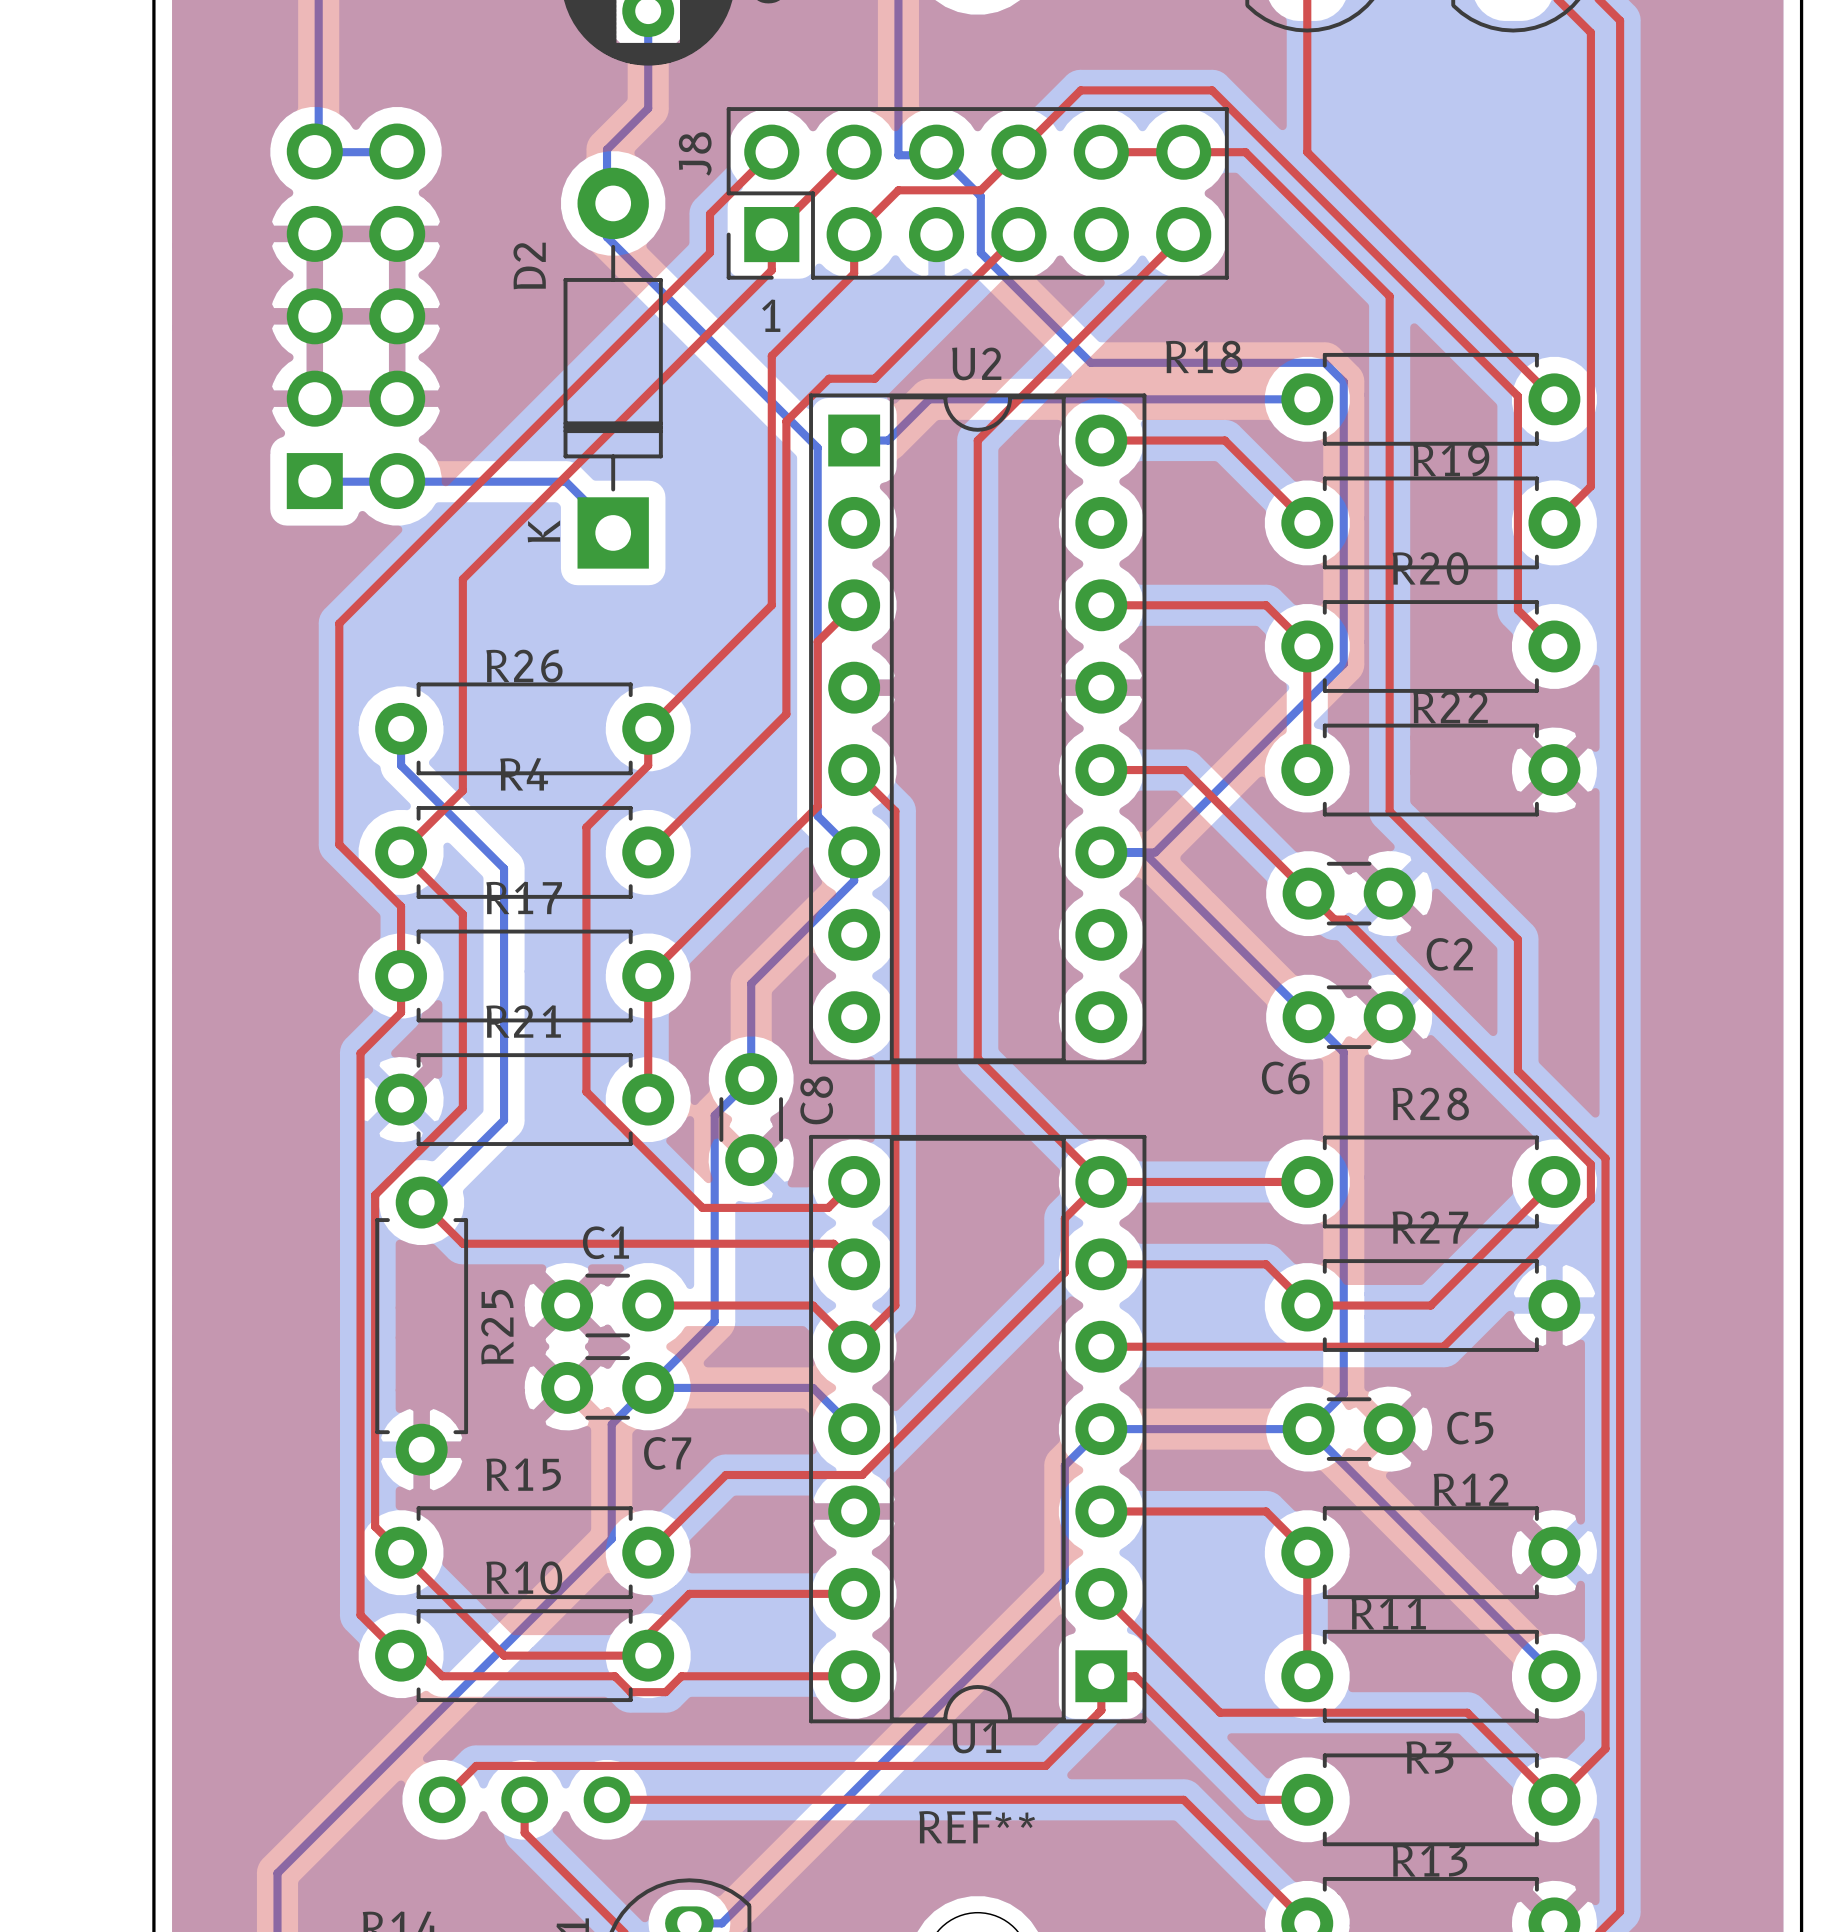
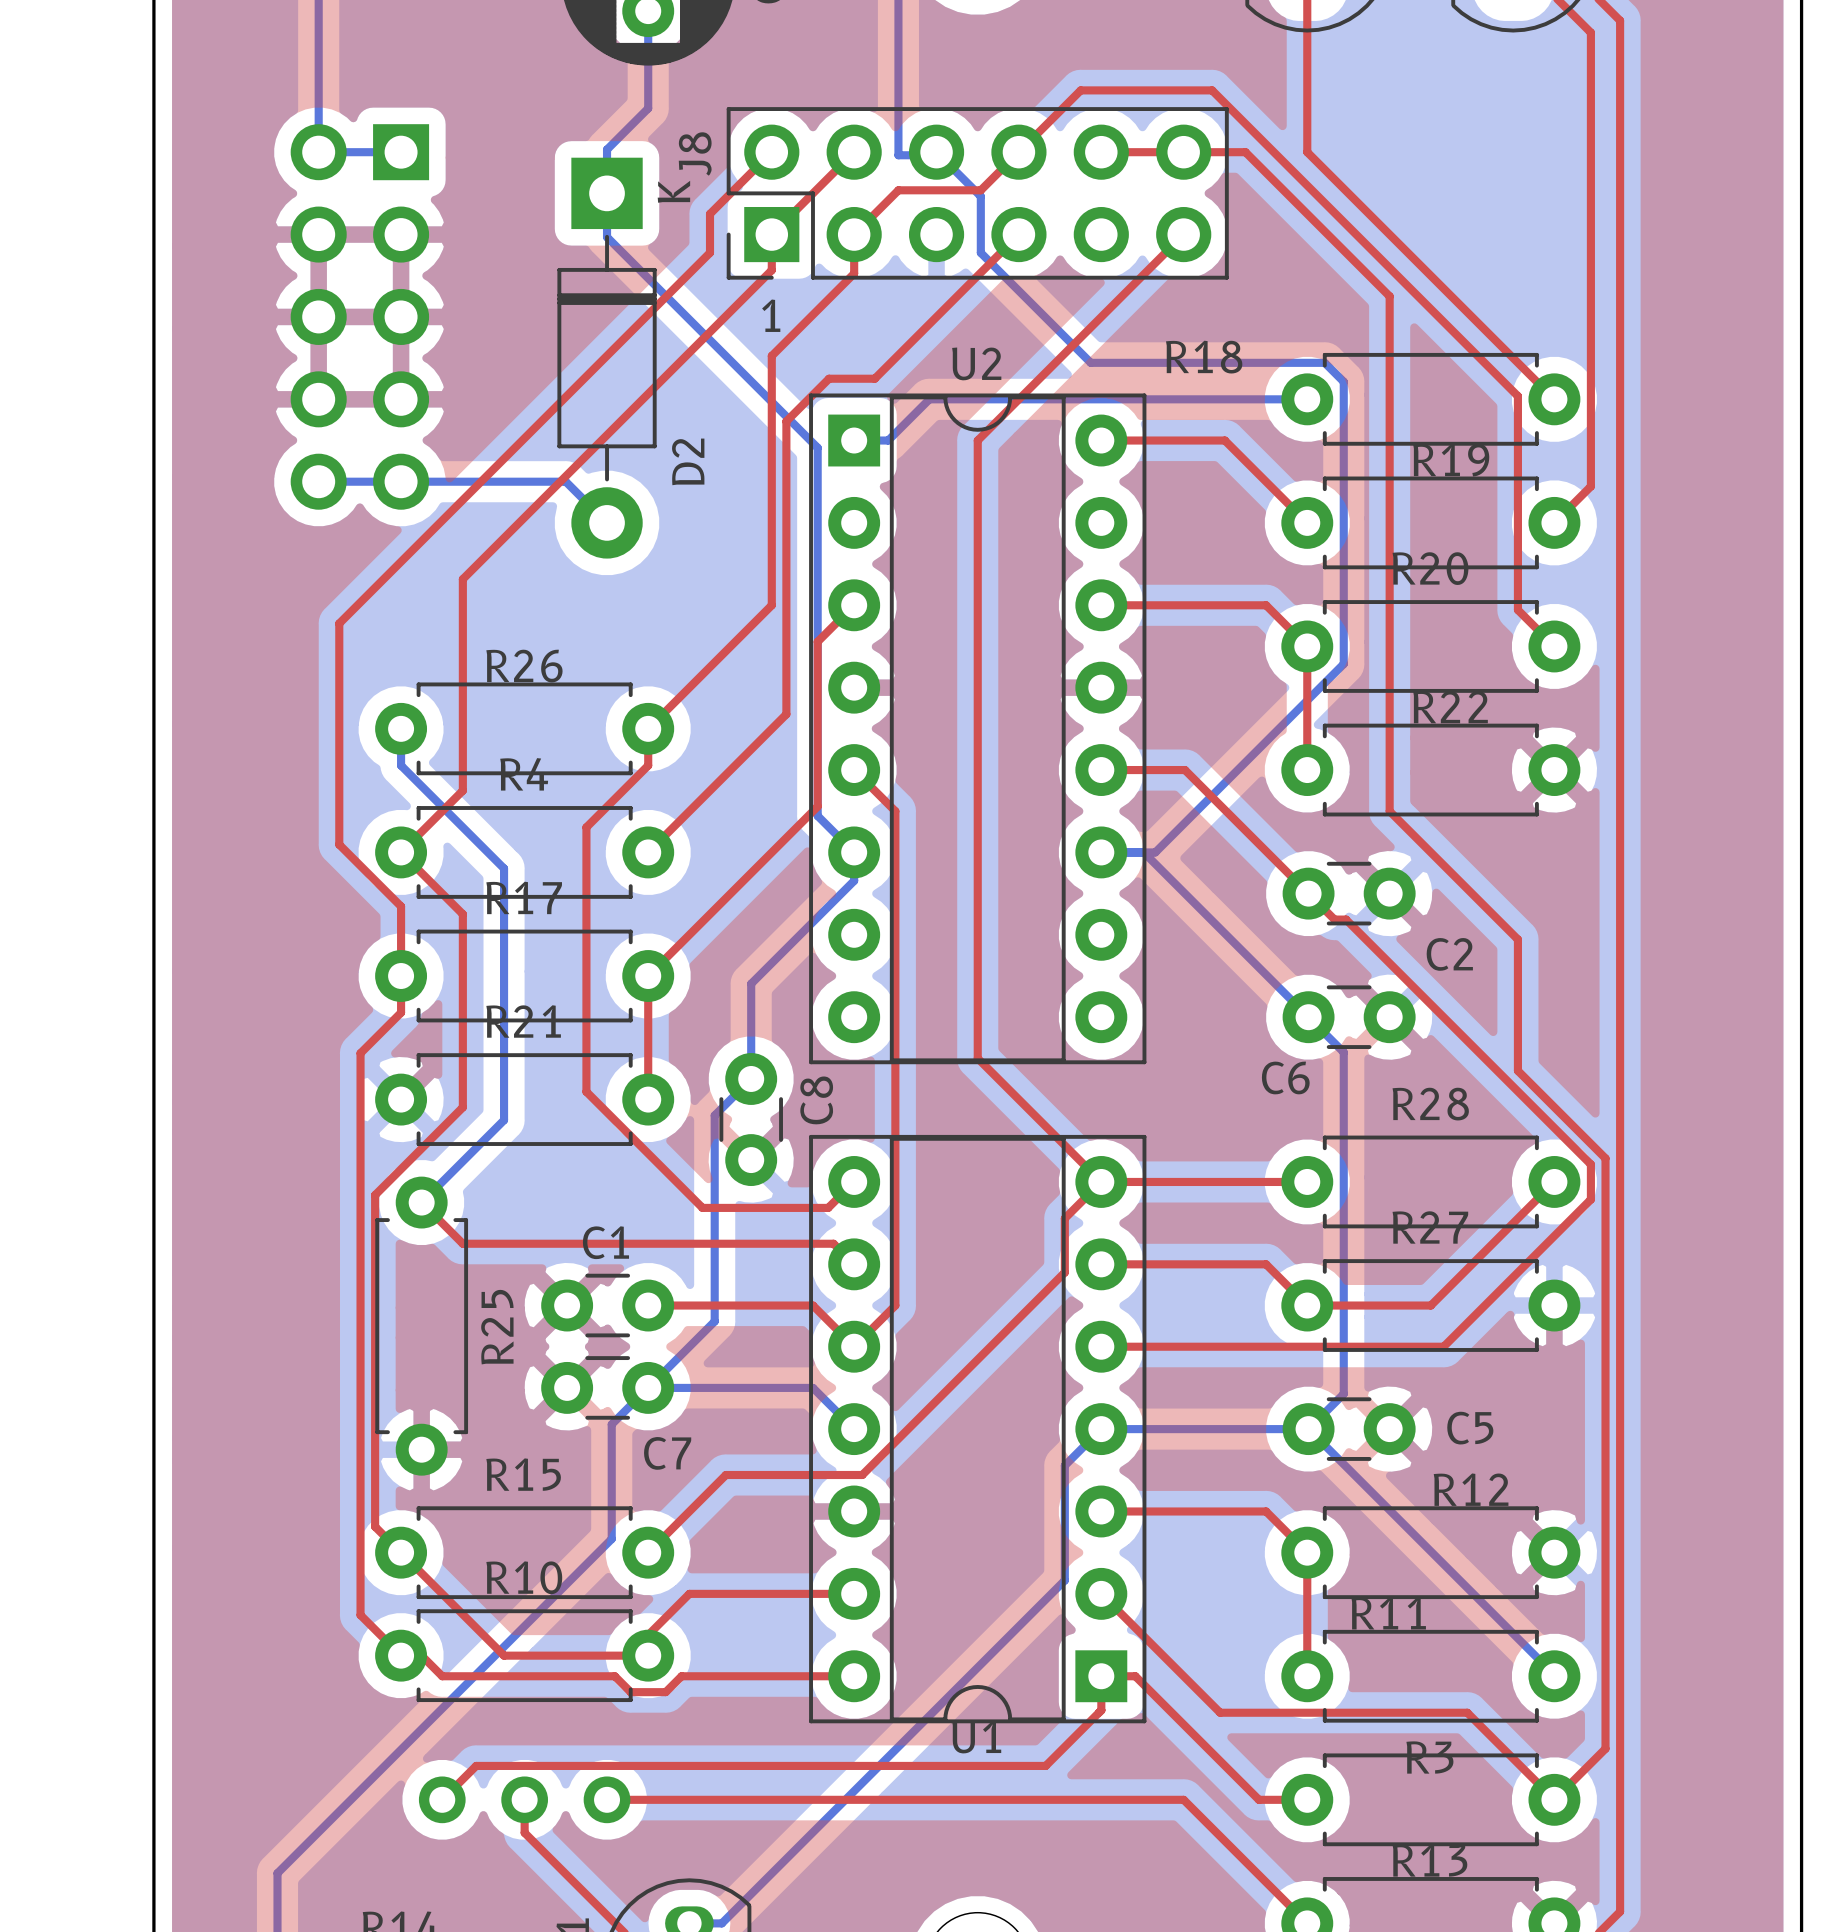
part rotation: 0° (355, 316) -> 180° (359, 316)
D2 rotation: 0° (613, 368) -> 180° (607, 358)
REF** name: REF** (977, 1827) -> none

